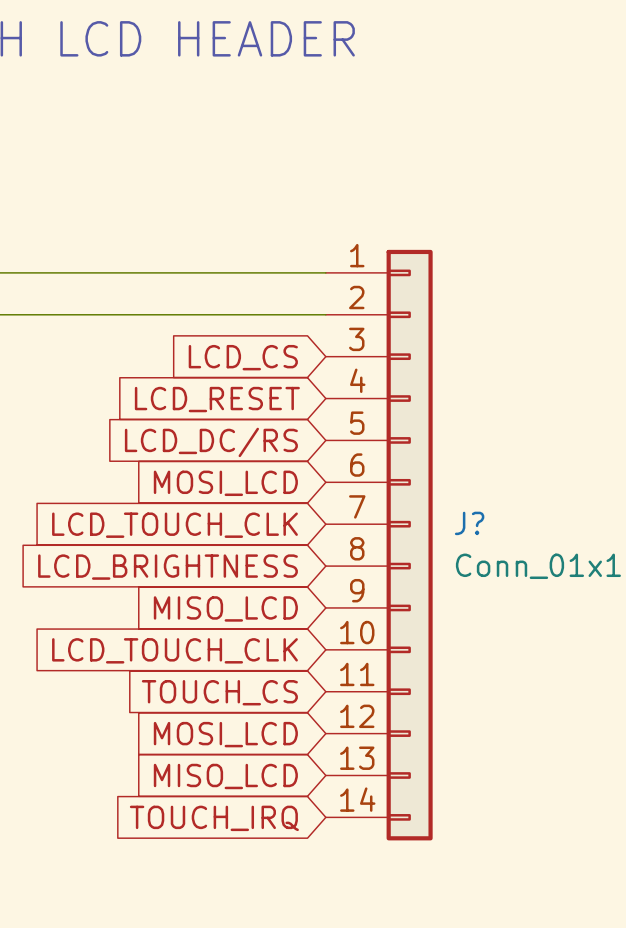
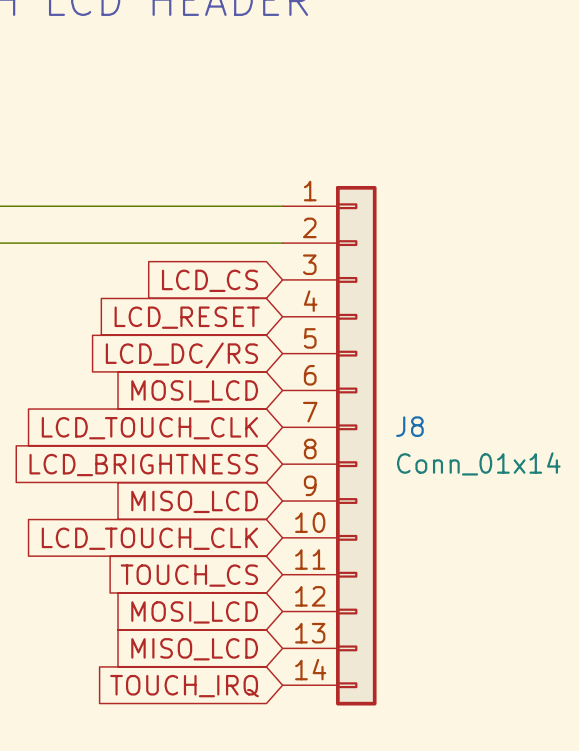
J? name: J? (469, 523) -> J8 (409, 426)

